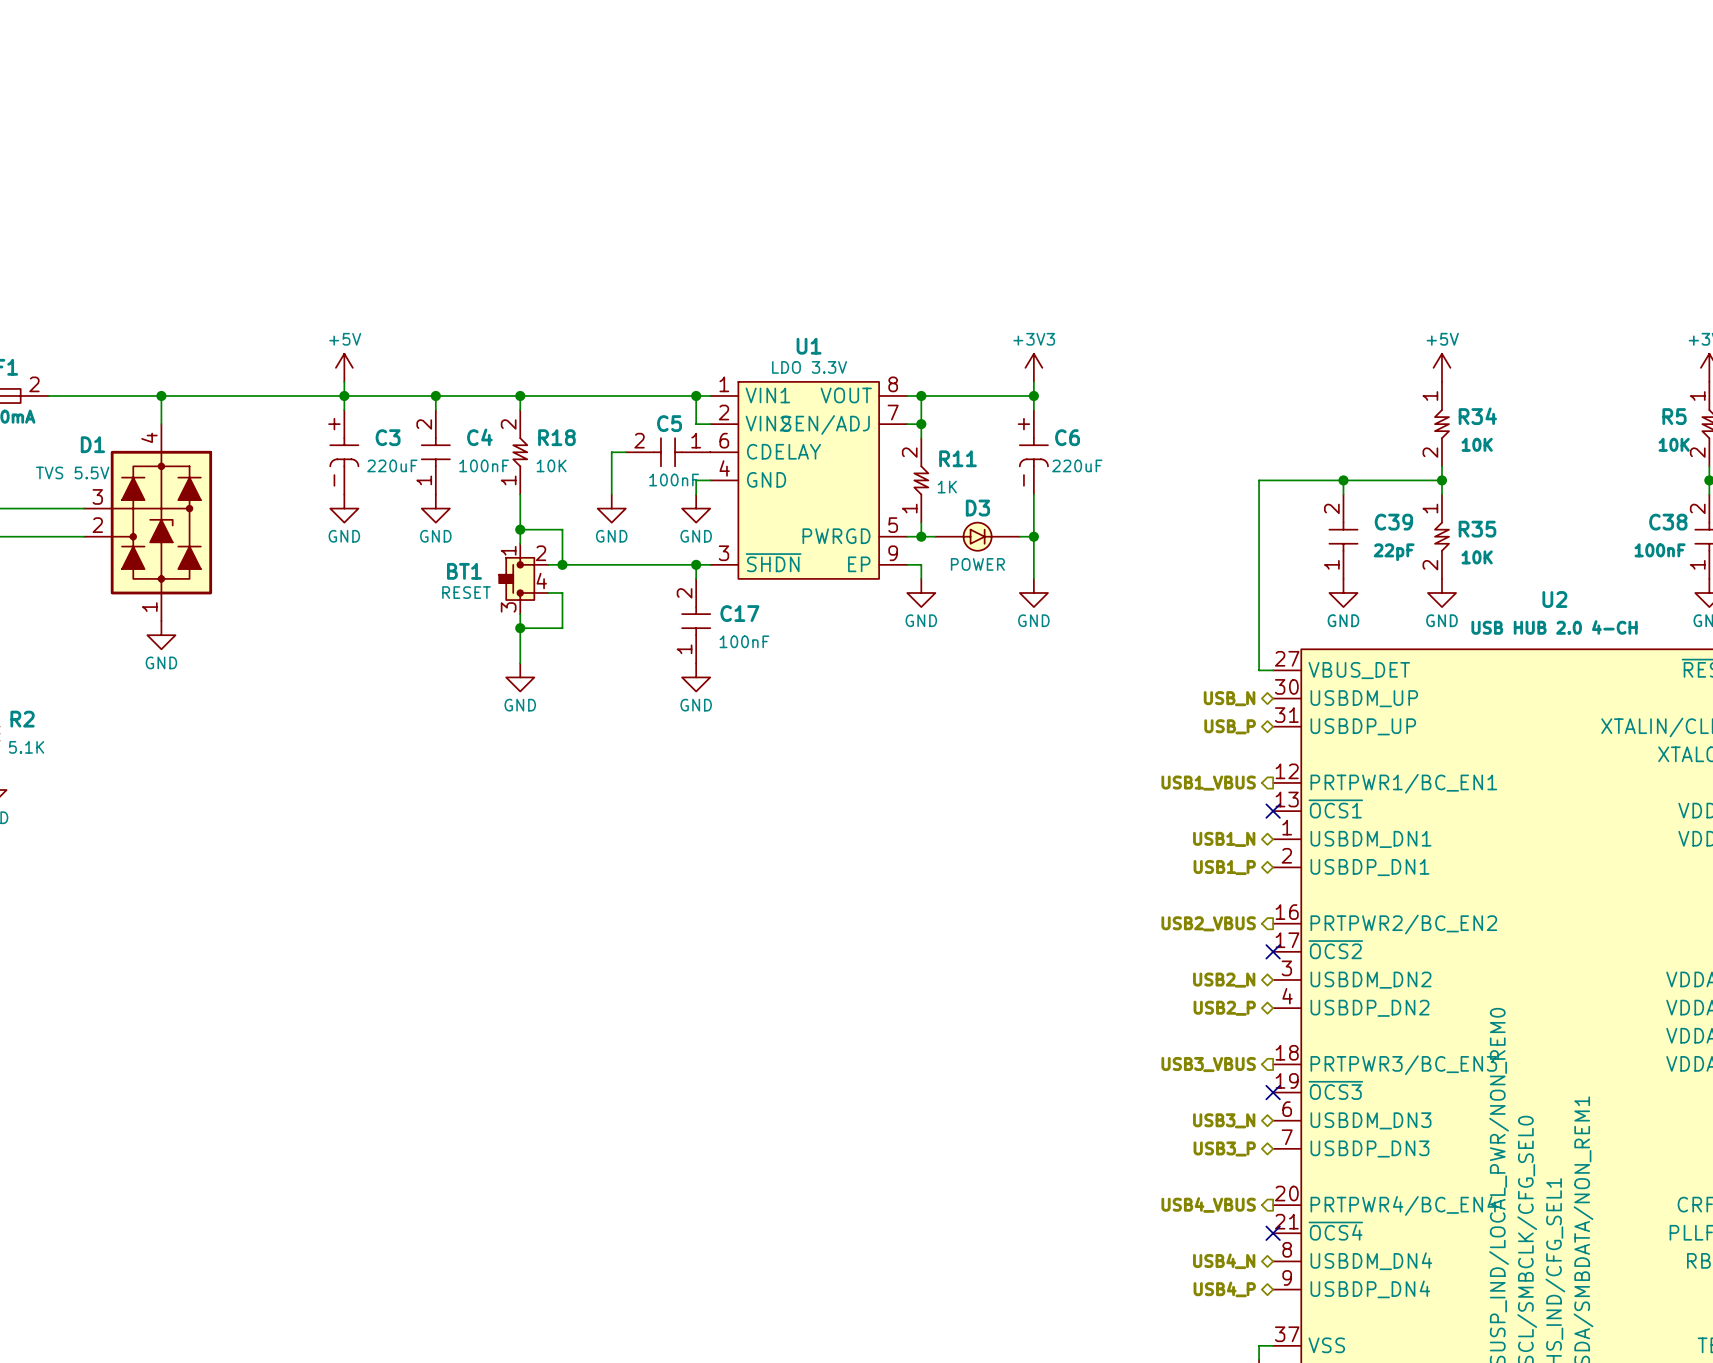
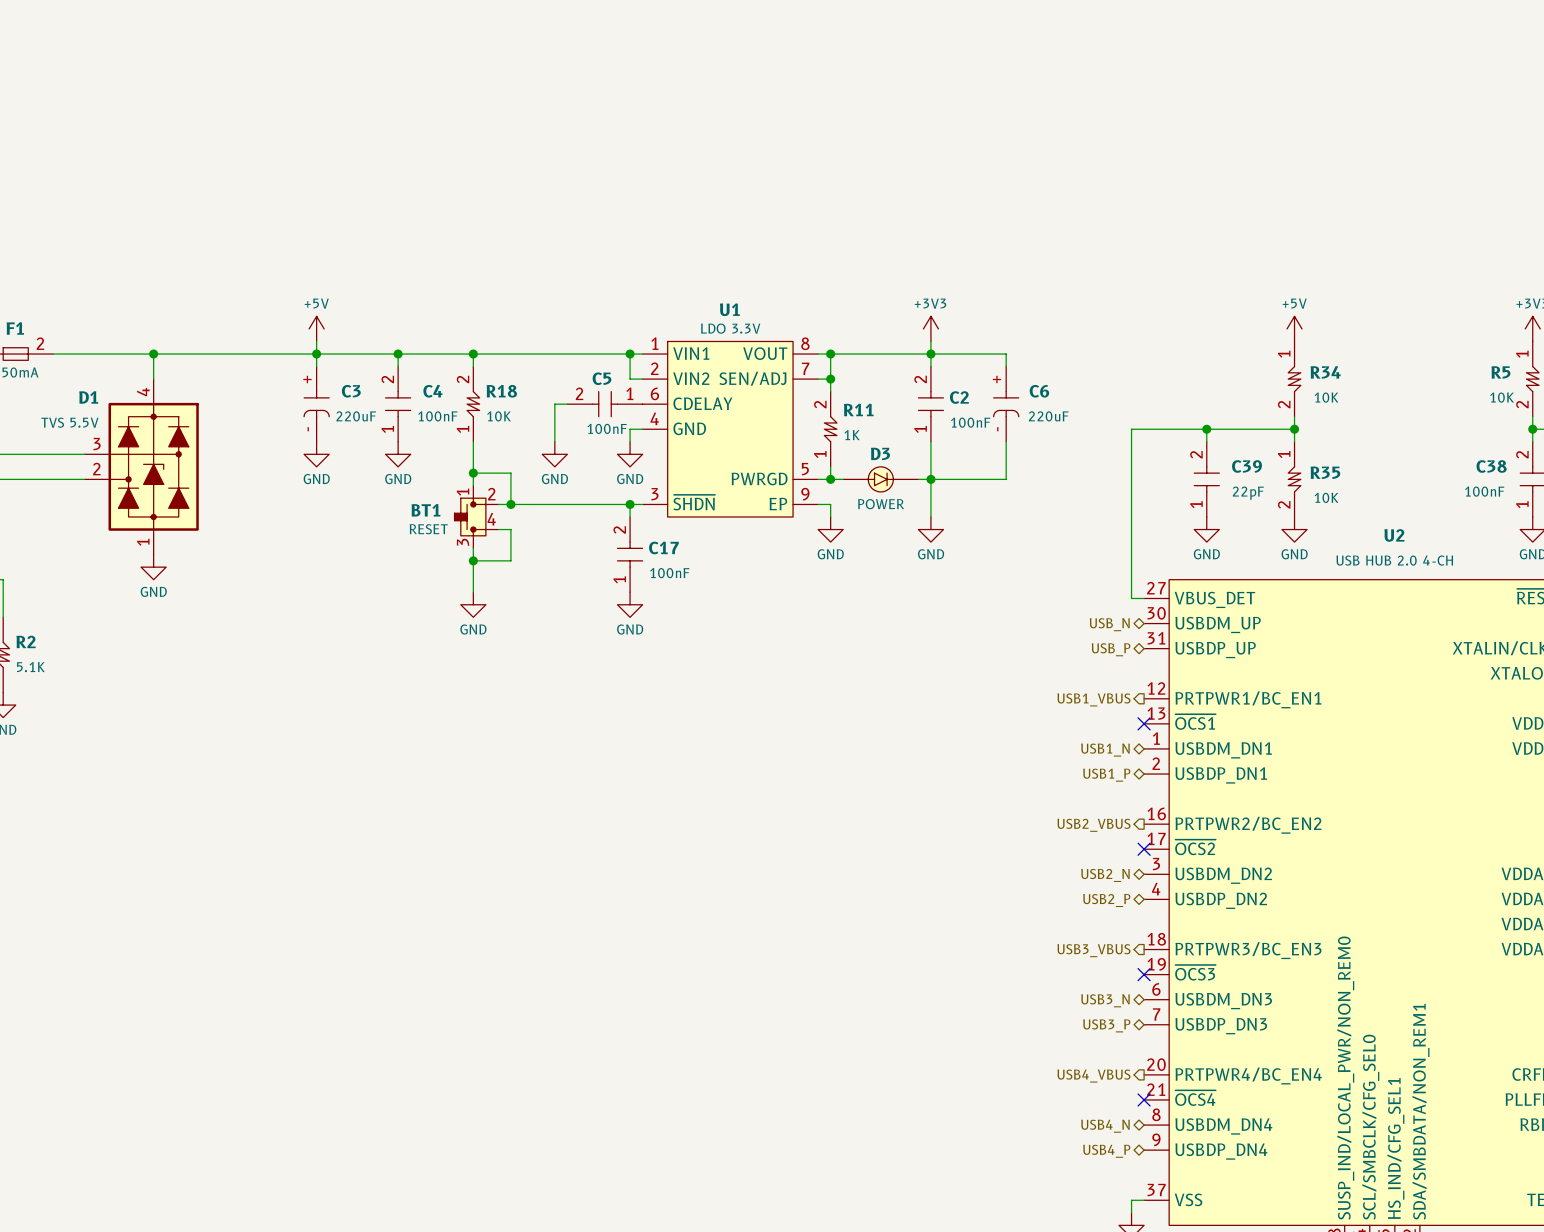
wire: none -> (930, 354) (1006, 354) (1006, 366)
C6 position: (1033, 452) -> (1006, 404)
C2: none -> 100nF (930, 404)
wire: none -> (1006, 441) (1006, 479) (930, 479)

